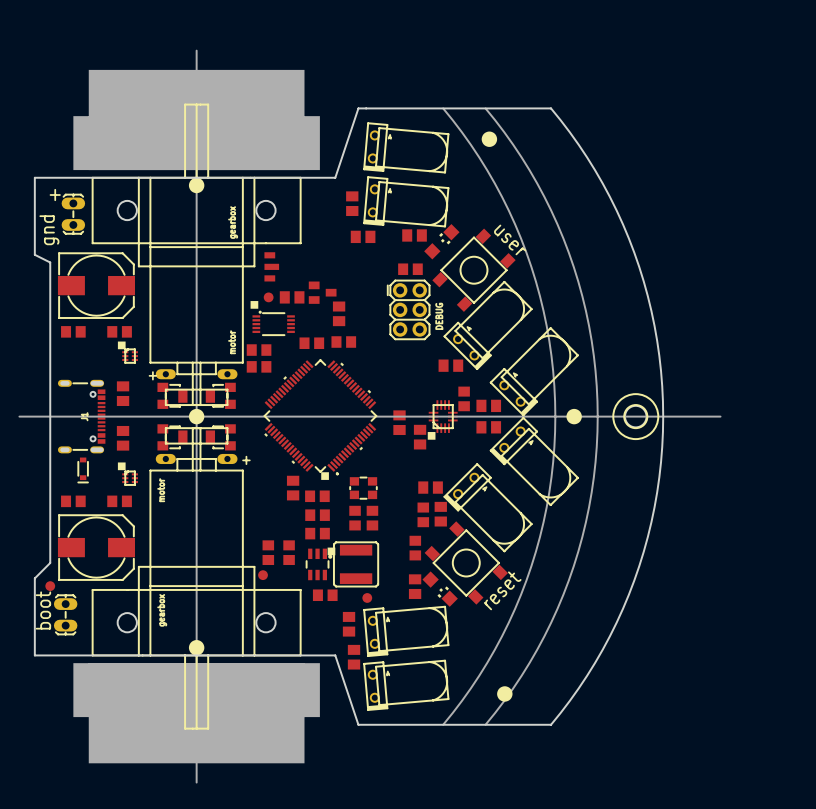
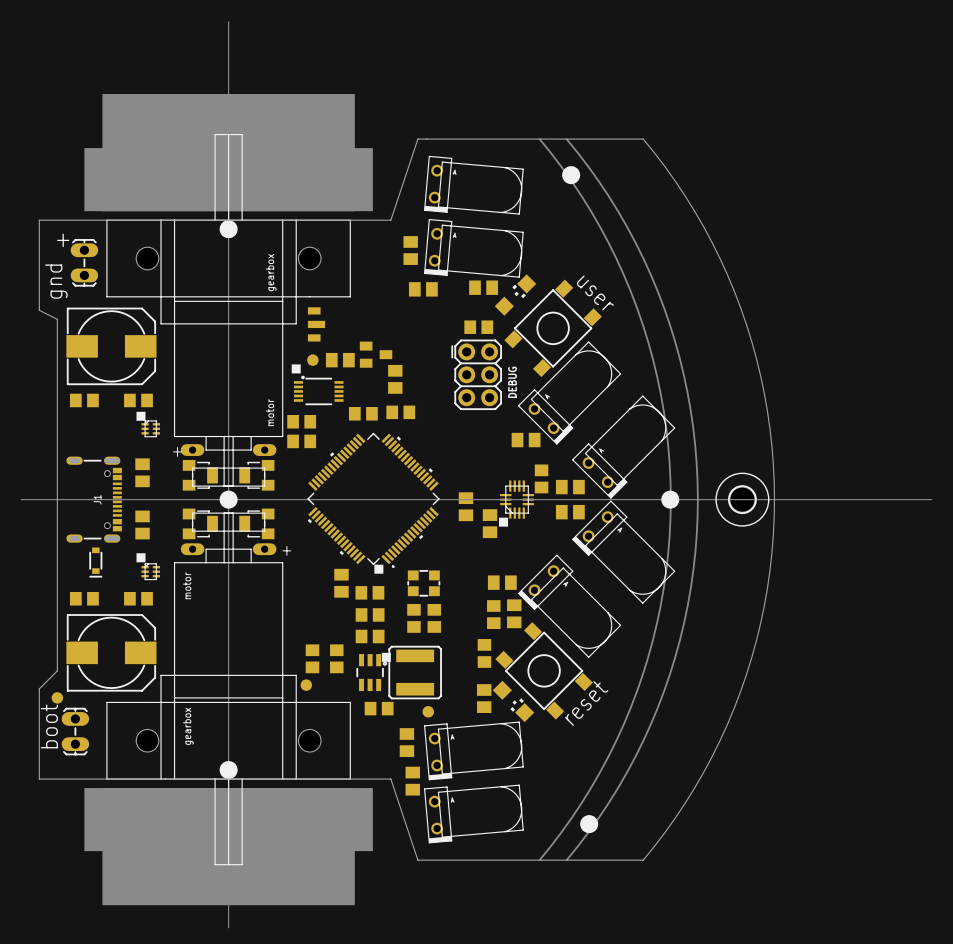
line: none -> (228, 21) (228, 71)
line: (443, 108) (487, 170) (508, 210) (526, 252) (546, 325) (553, 371) (555, 416) (553, 462) (546, 507) (526, 580) (508, 622) (487, 662) (443, 724) -> (539, 139) (561, 167) (591, 211) (616, 258) (636, 307) (652, 358) (660, 393) (668, 446) (670, 499) (668, 552) (660, 605) (652, 640) (636, 691) (616, 740) (591, 787) (561, 832) (539, 860)
line: none -> (841, 499) (931, 499)

